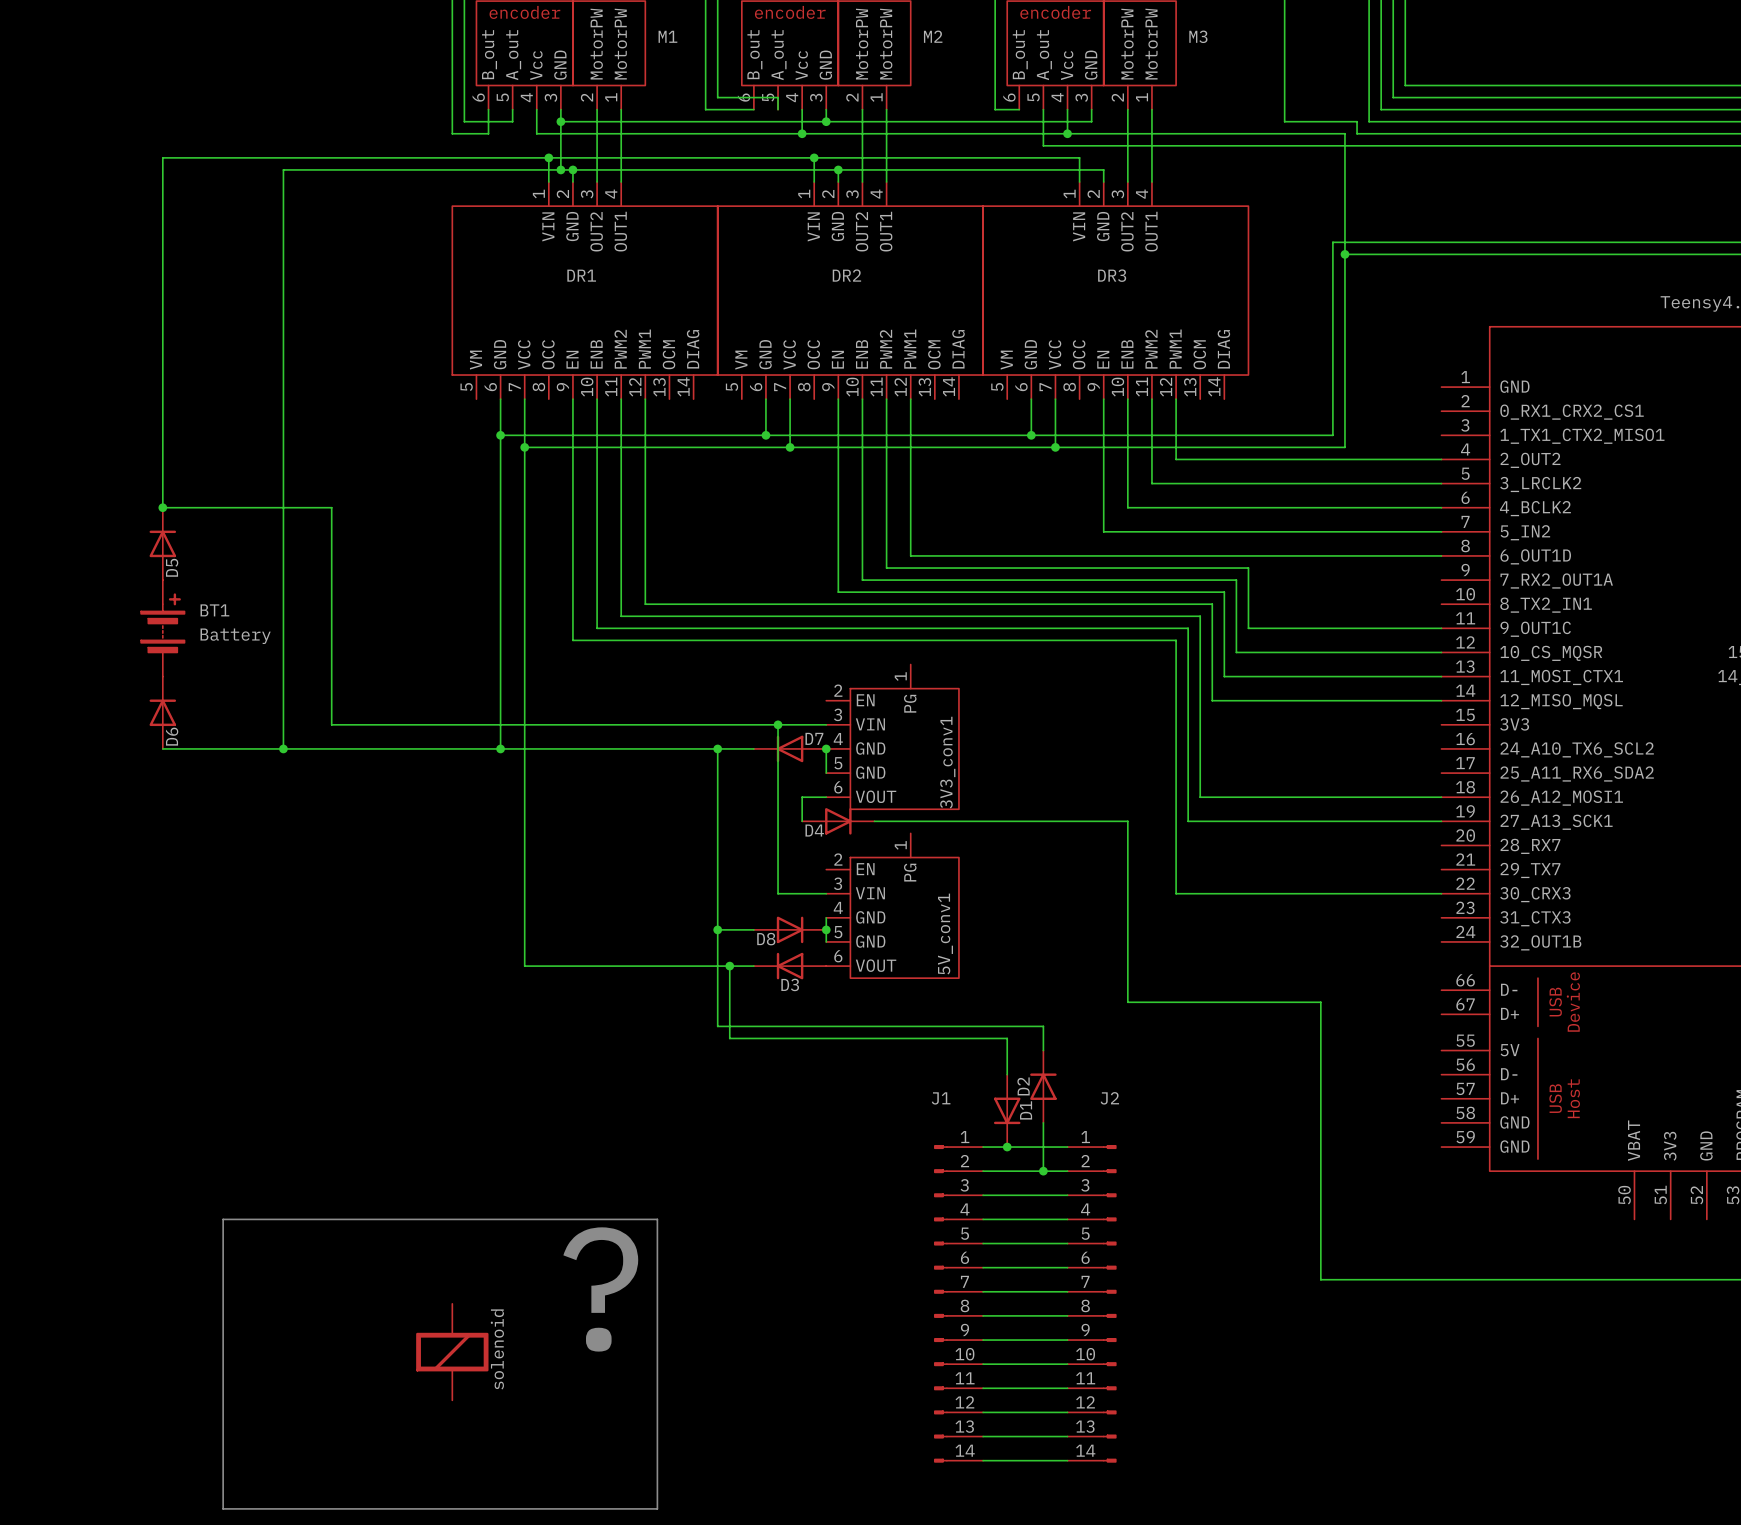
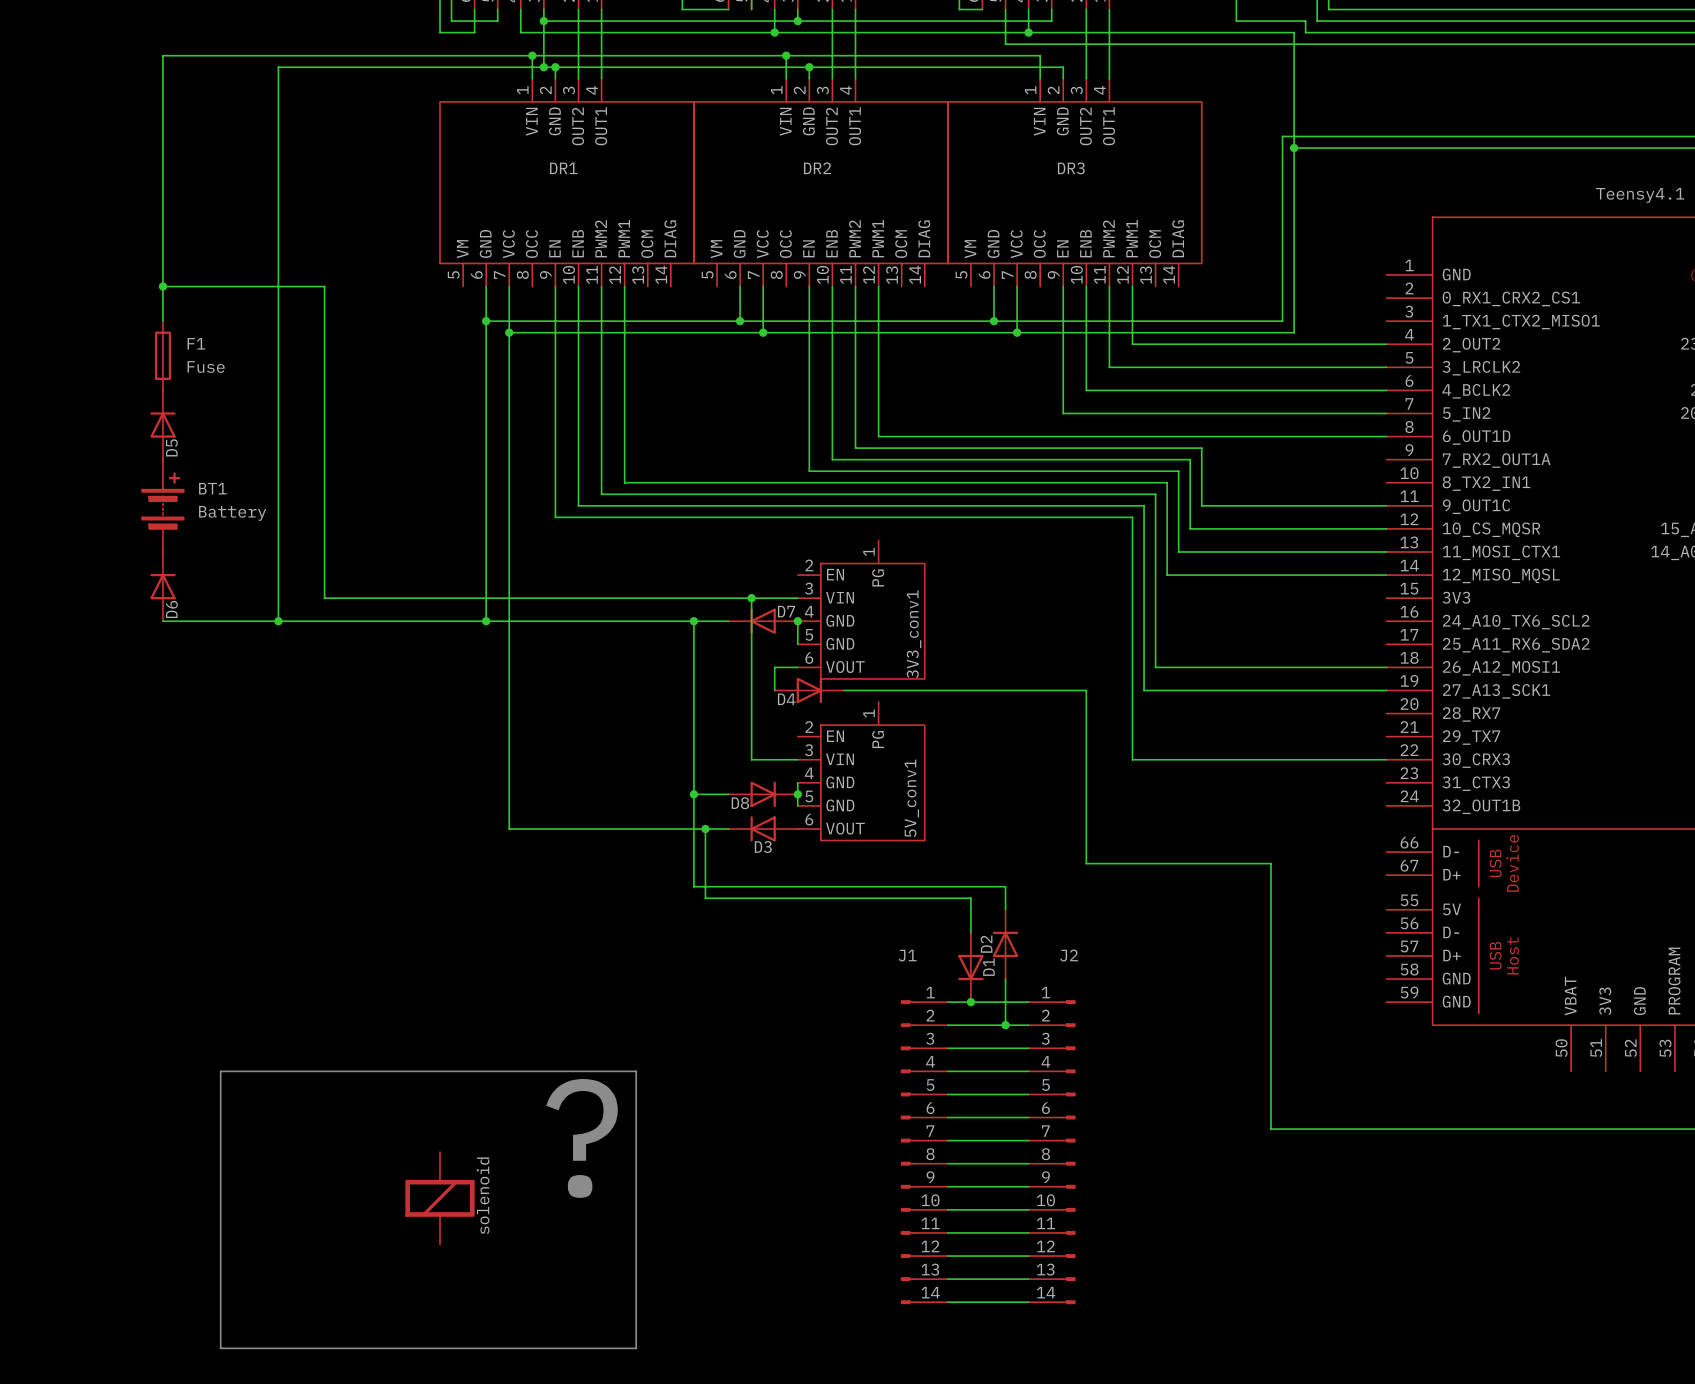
junction: none -> (162, 286)
wire: (162, 435) (162, 507) (331, 507) -> (162, 286) (324, 286) (324, 390)
F1: none -> Fuse (162, 355)
junction: (162, 507) -> none

